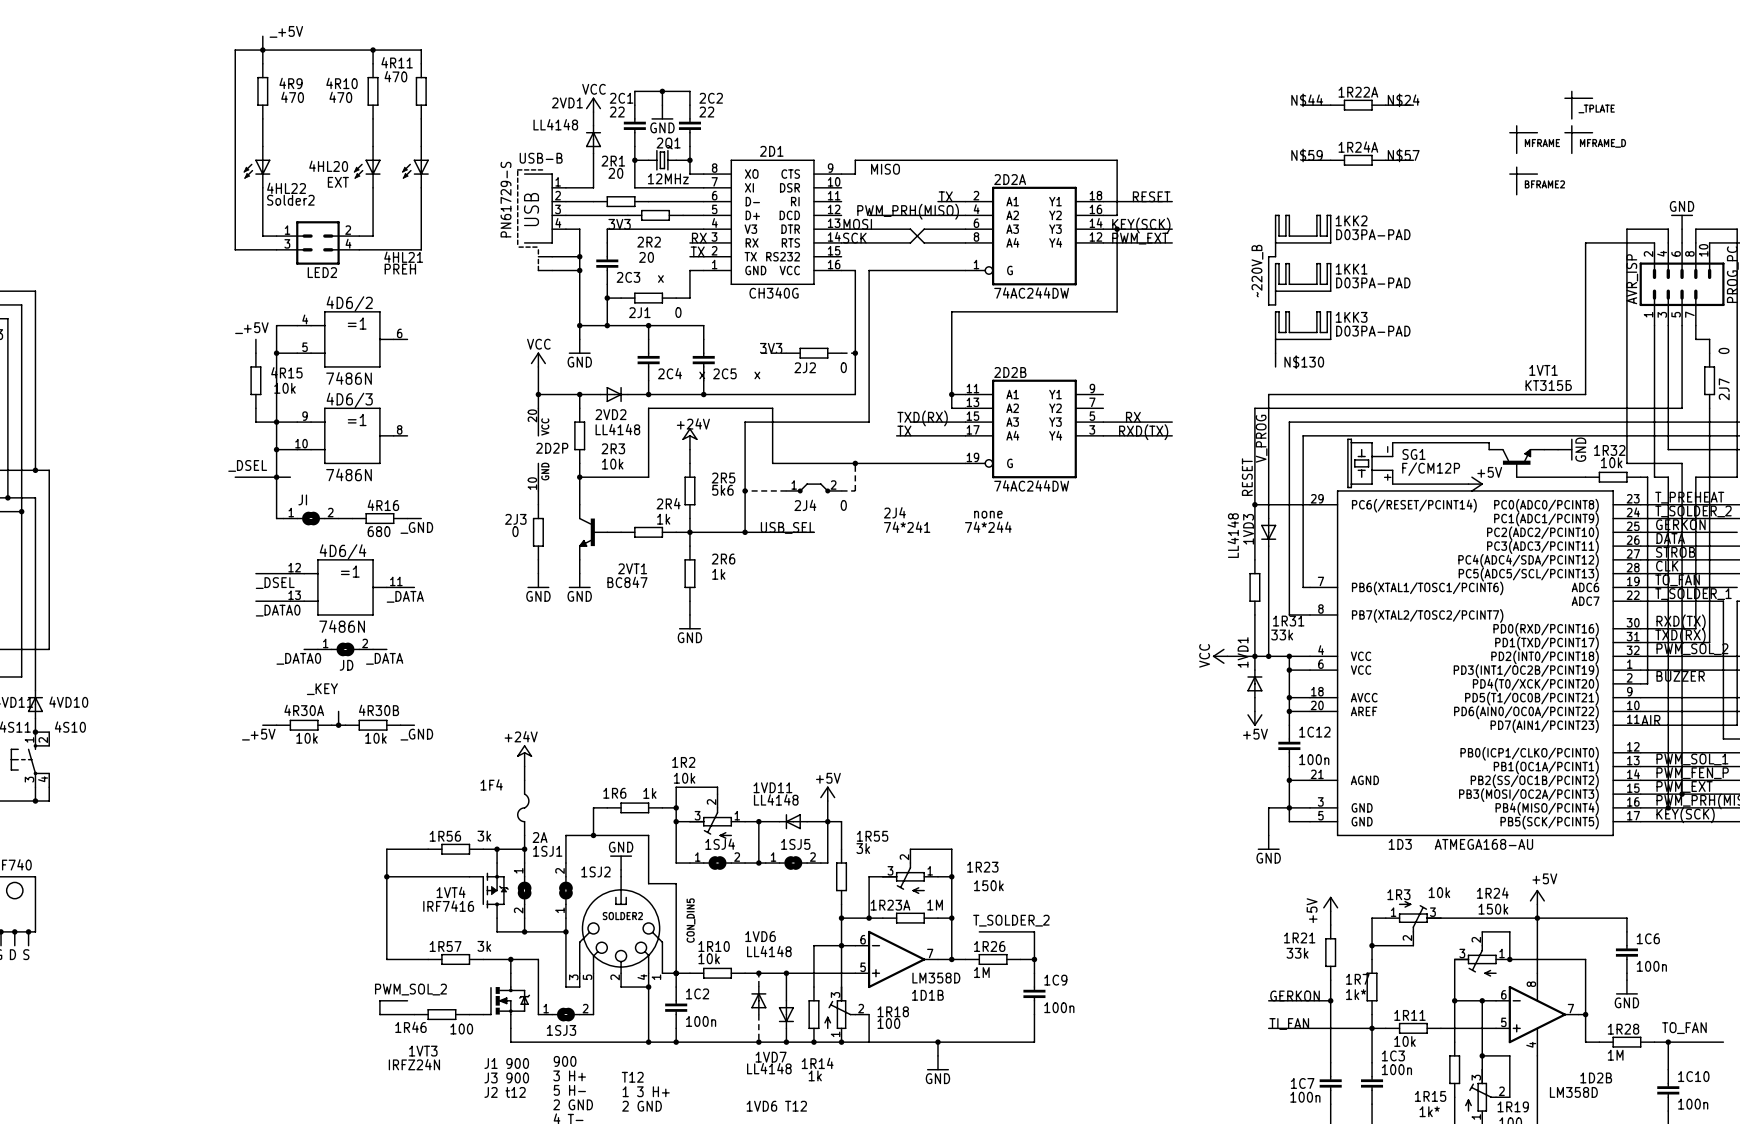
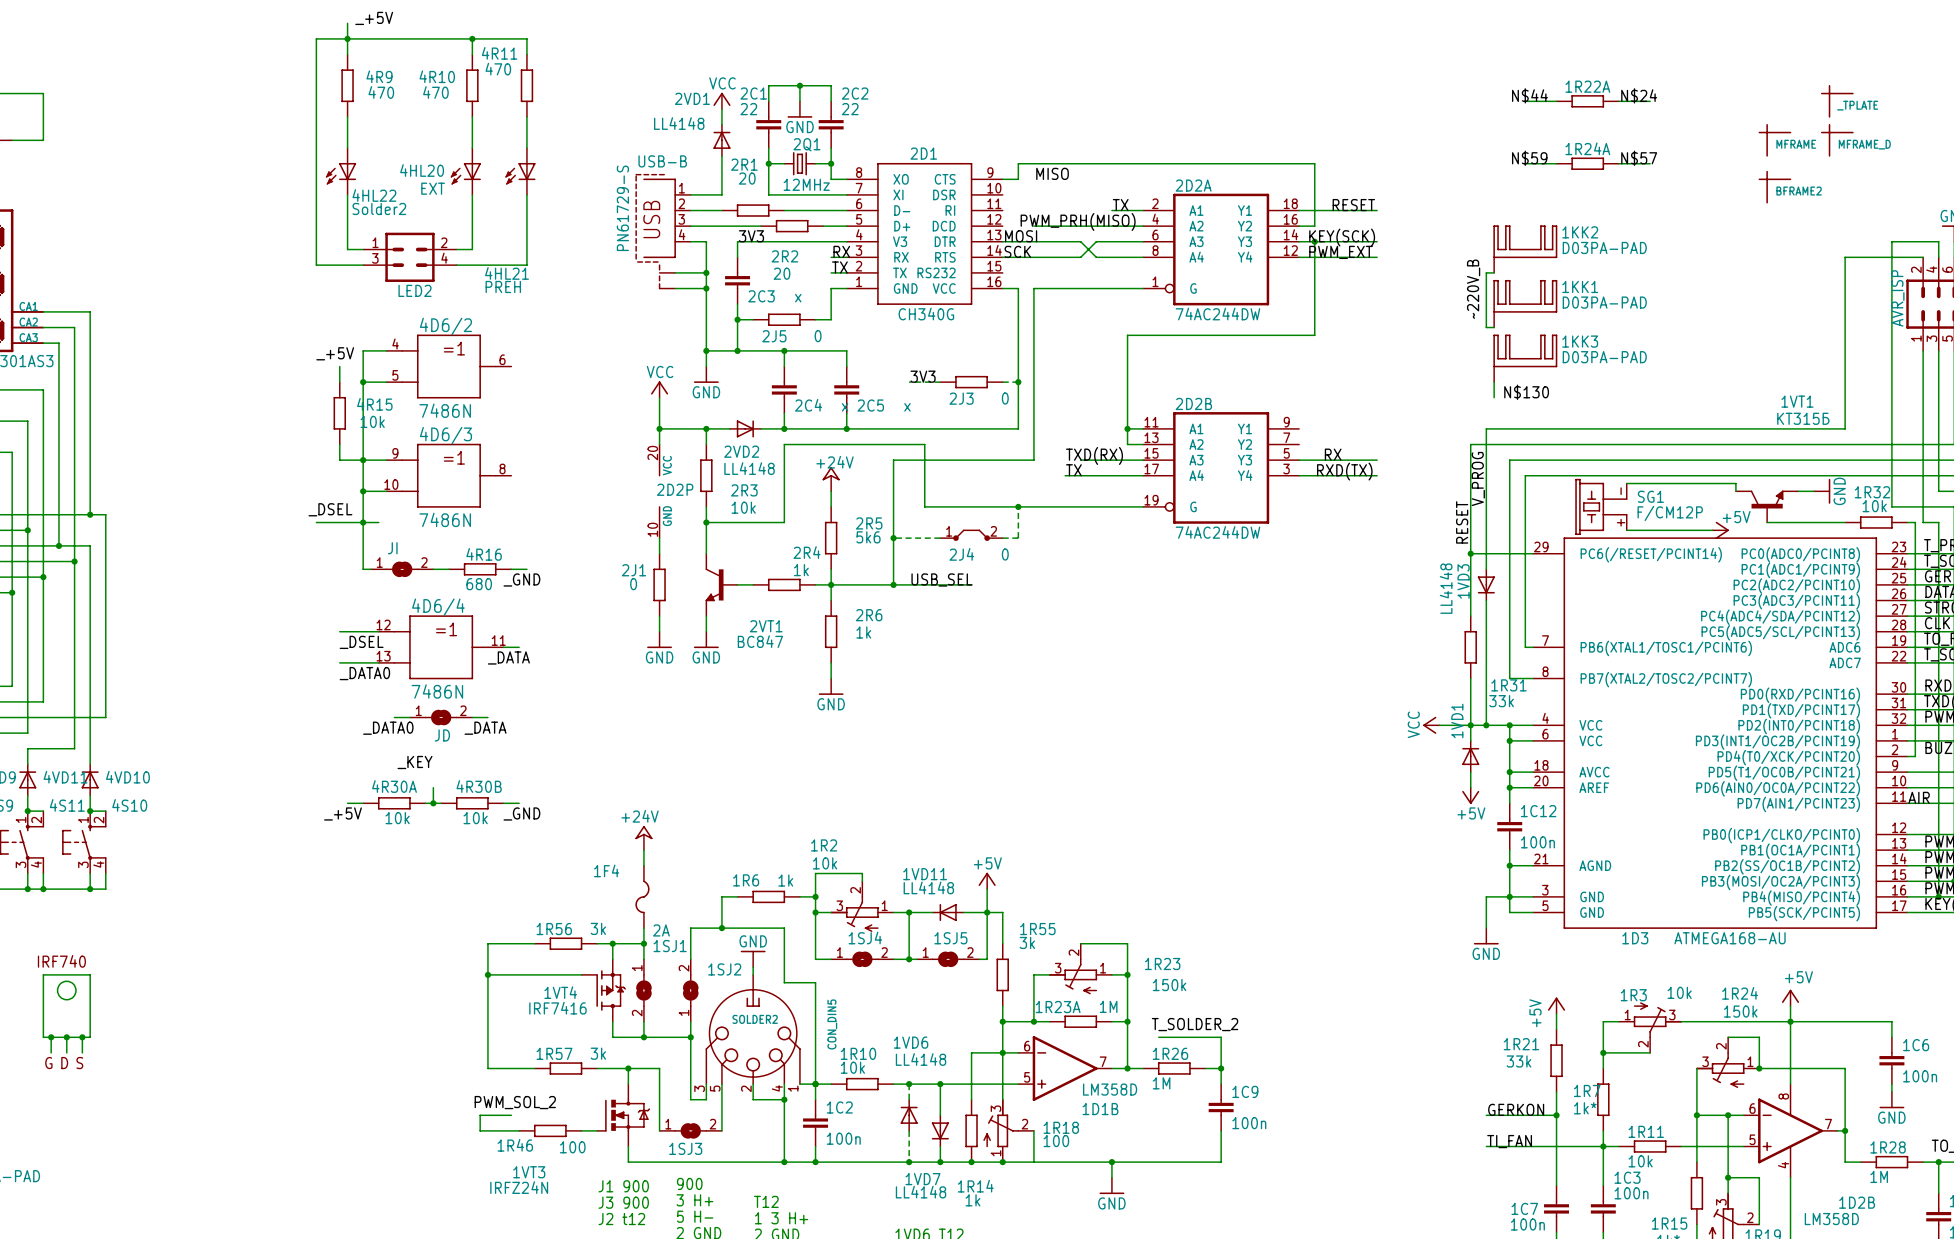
2J1 name: 2J1 (639, 312) -> 2J5 (774, 336)
2J2 name: 2J2 (805, 367) -> 2J3 (961, 398)
text: 2J4 none (943, 512) -> none
2J3 name: 2J3 (515, 519) -> 2J1 (634, 570)
text: 74*241 74*244 (947, 527) -> none

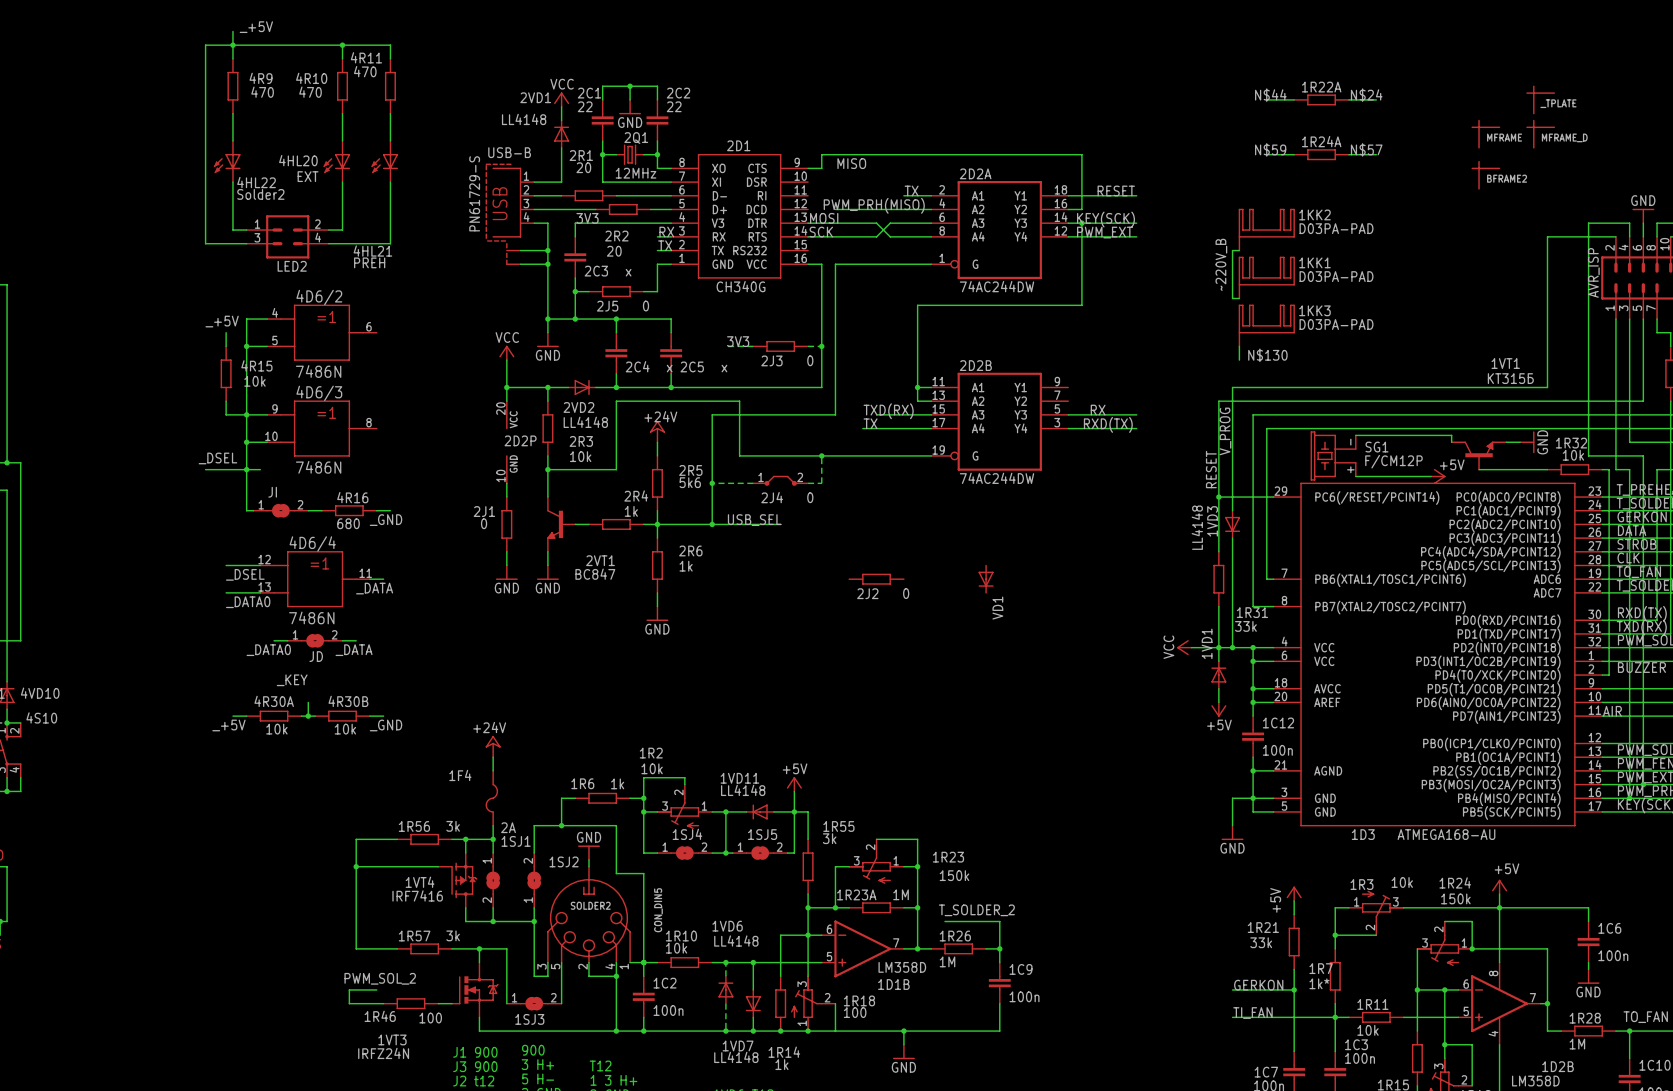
2J2: none -> 0 (876, 579)
VD1: none -> (986, 579)

